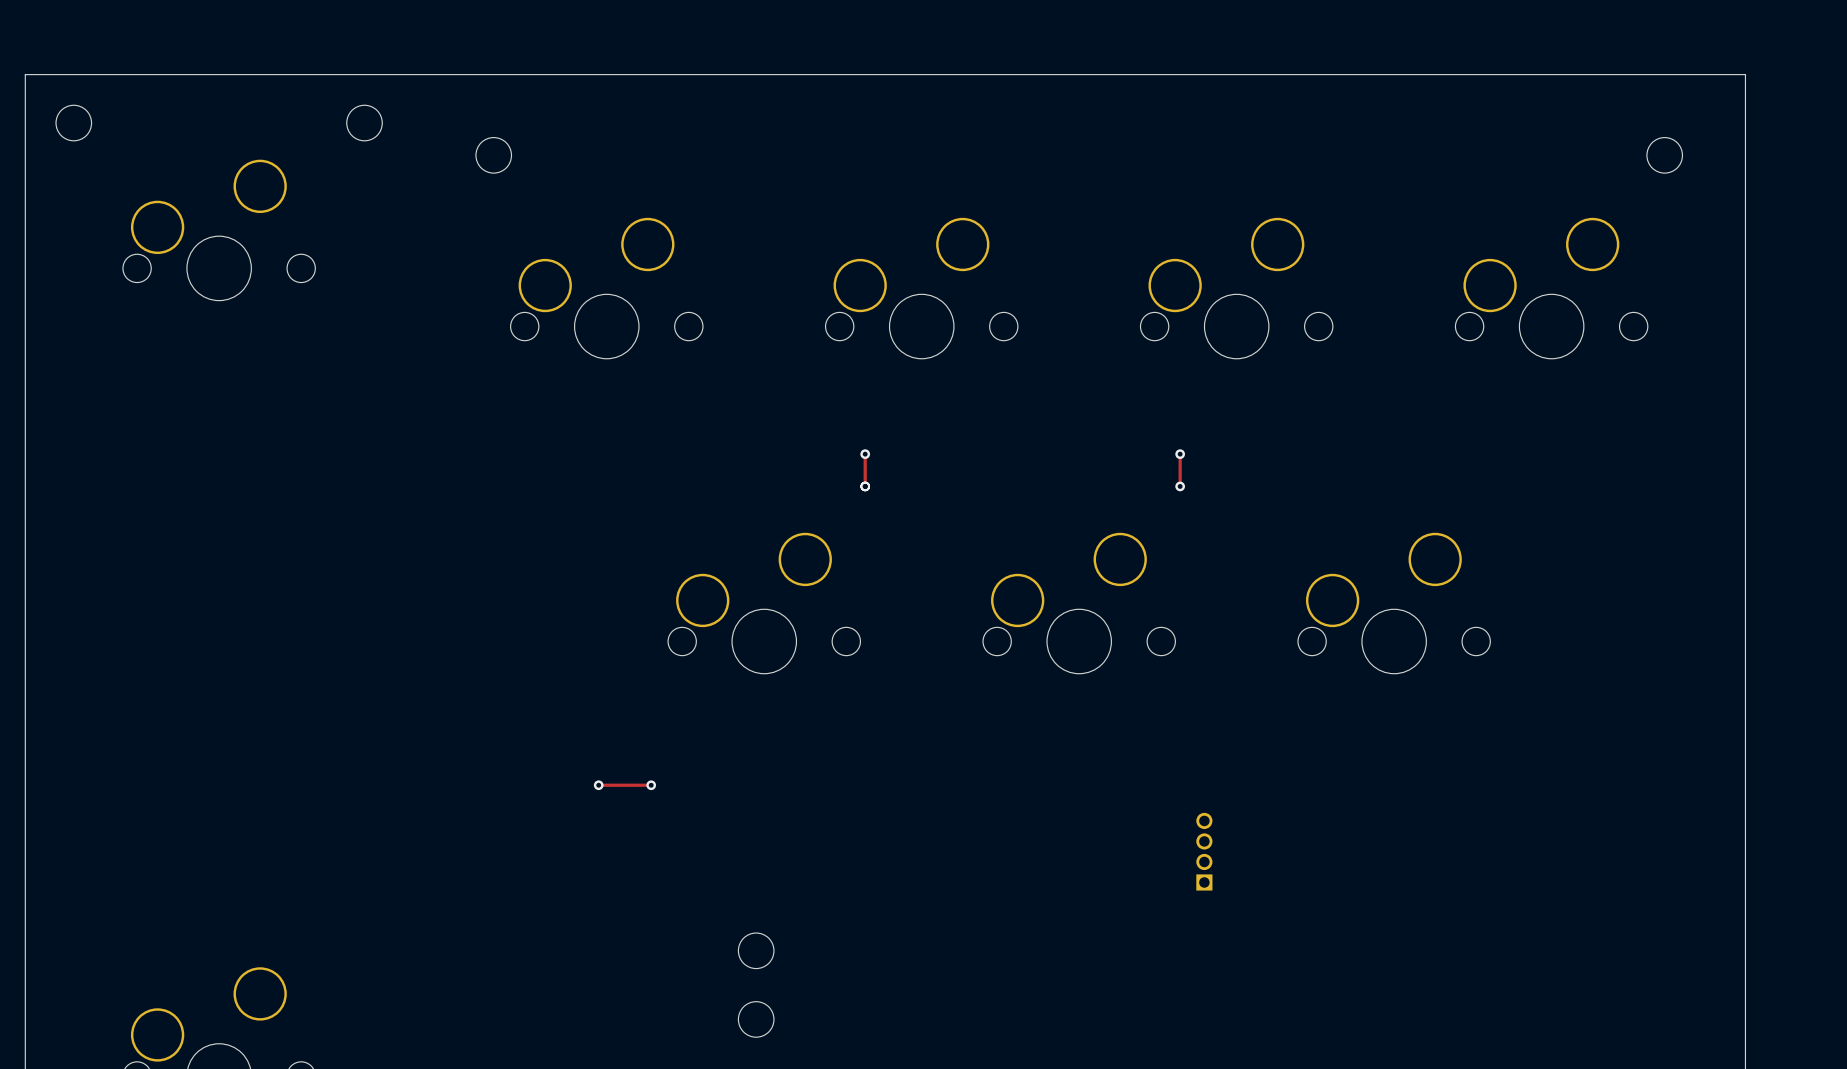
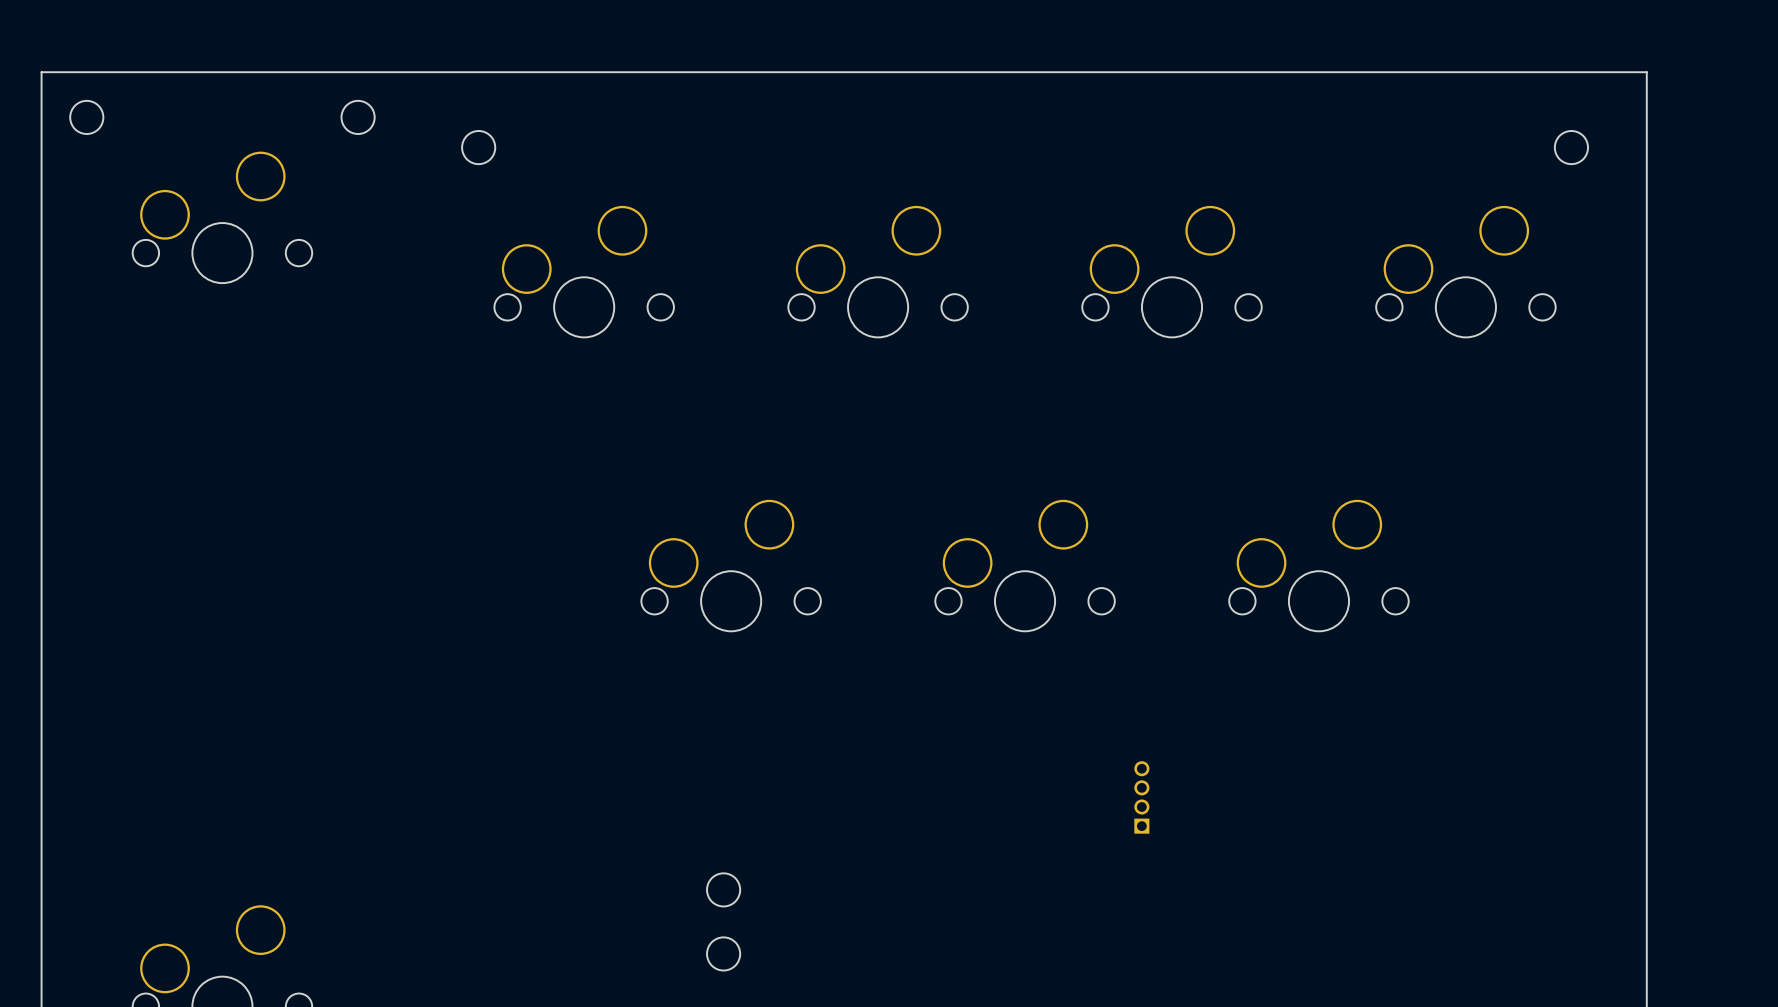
track: (865, 454) (865, 486) -> none
via: (865, 454) -> none
track: (1180, 454) (1180, 486) -> none
via: (1180, 454) -> none
via: (865, 486) -> none
via: (1180, 486) -> none
track: (598, 785) (651, 785) -> none
via: (598, 785) -> none
via: (651, 785) -> none

